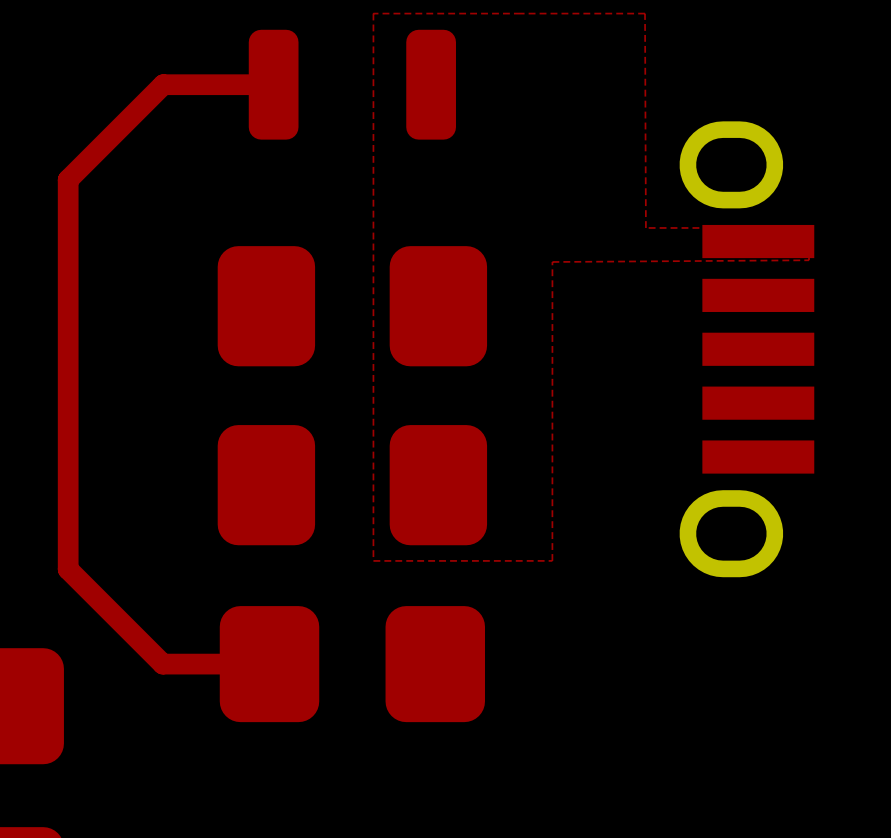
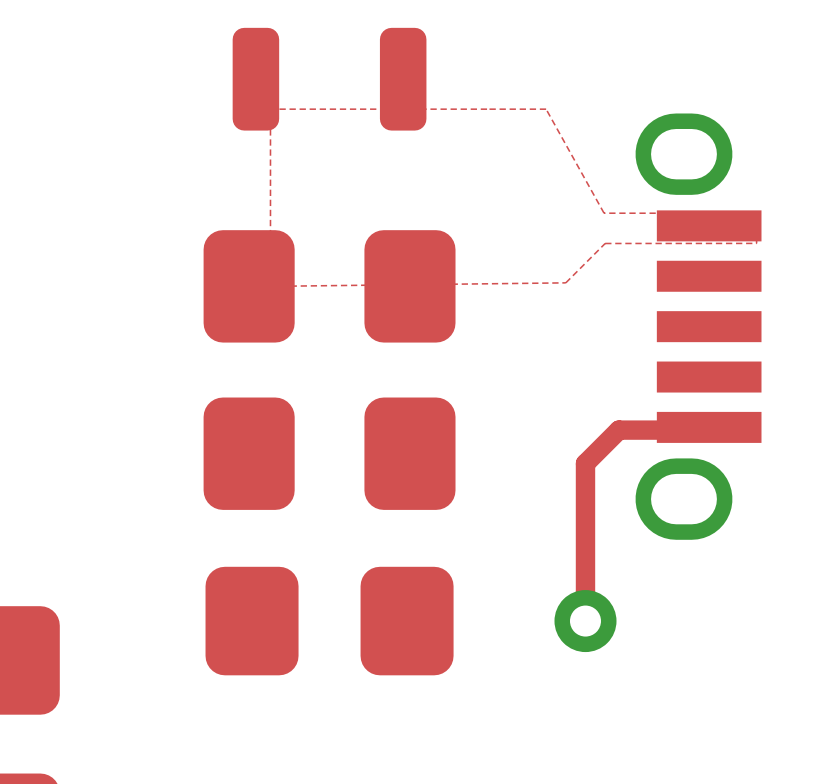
top track: (273, 84) (163, 84) (68, 179) (68, 569) (162, 664) (269, 664) -> none
top zone outline: (645, 227) (645, 13) (373, 13) (373, 560) (552, 560) (552, 261) (809, 260) -> (604, 213) (546, 109) (270, 109) (270, 286) (565, 282) (605, 243) (756, 243)
top track: none -> (704, 430) (618, 430) (585, 463) (585, 621)
via: none -> (585, 621)

